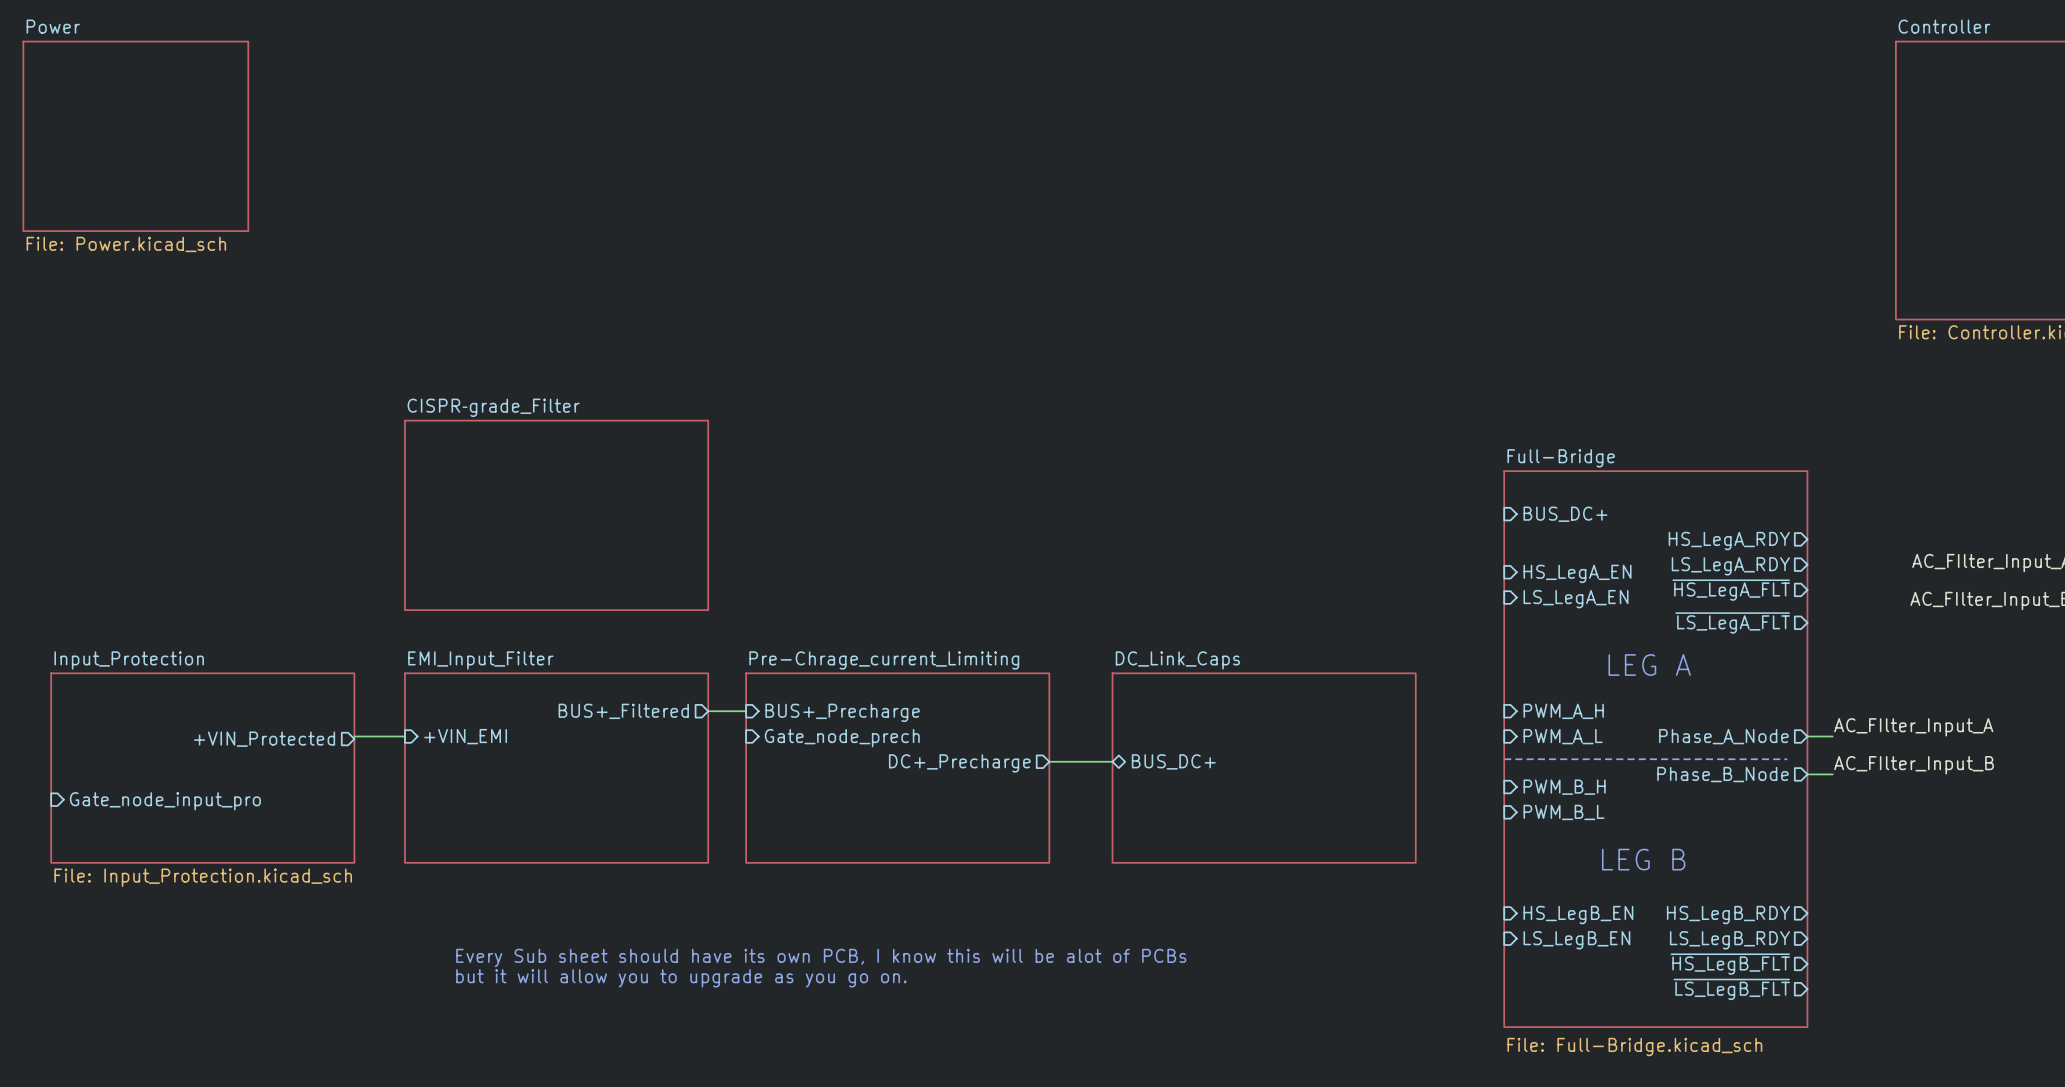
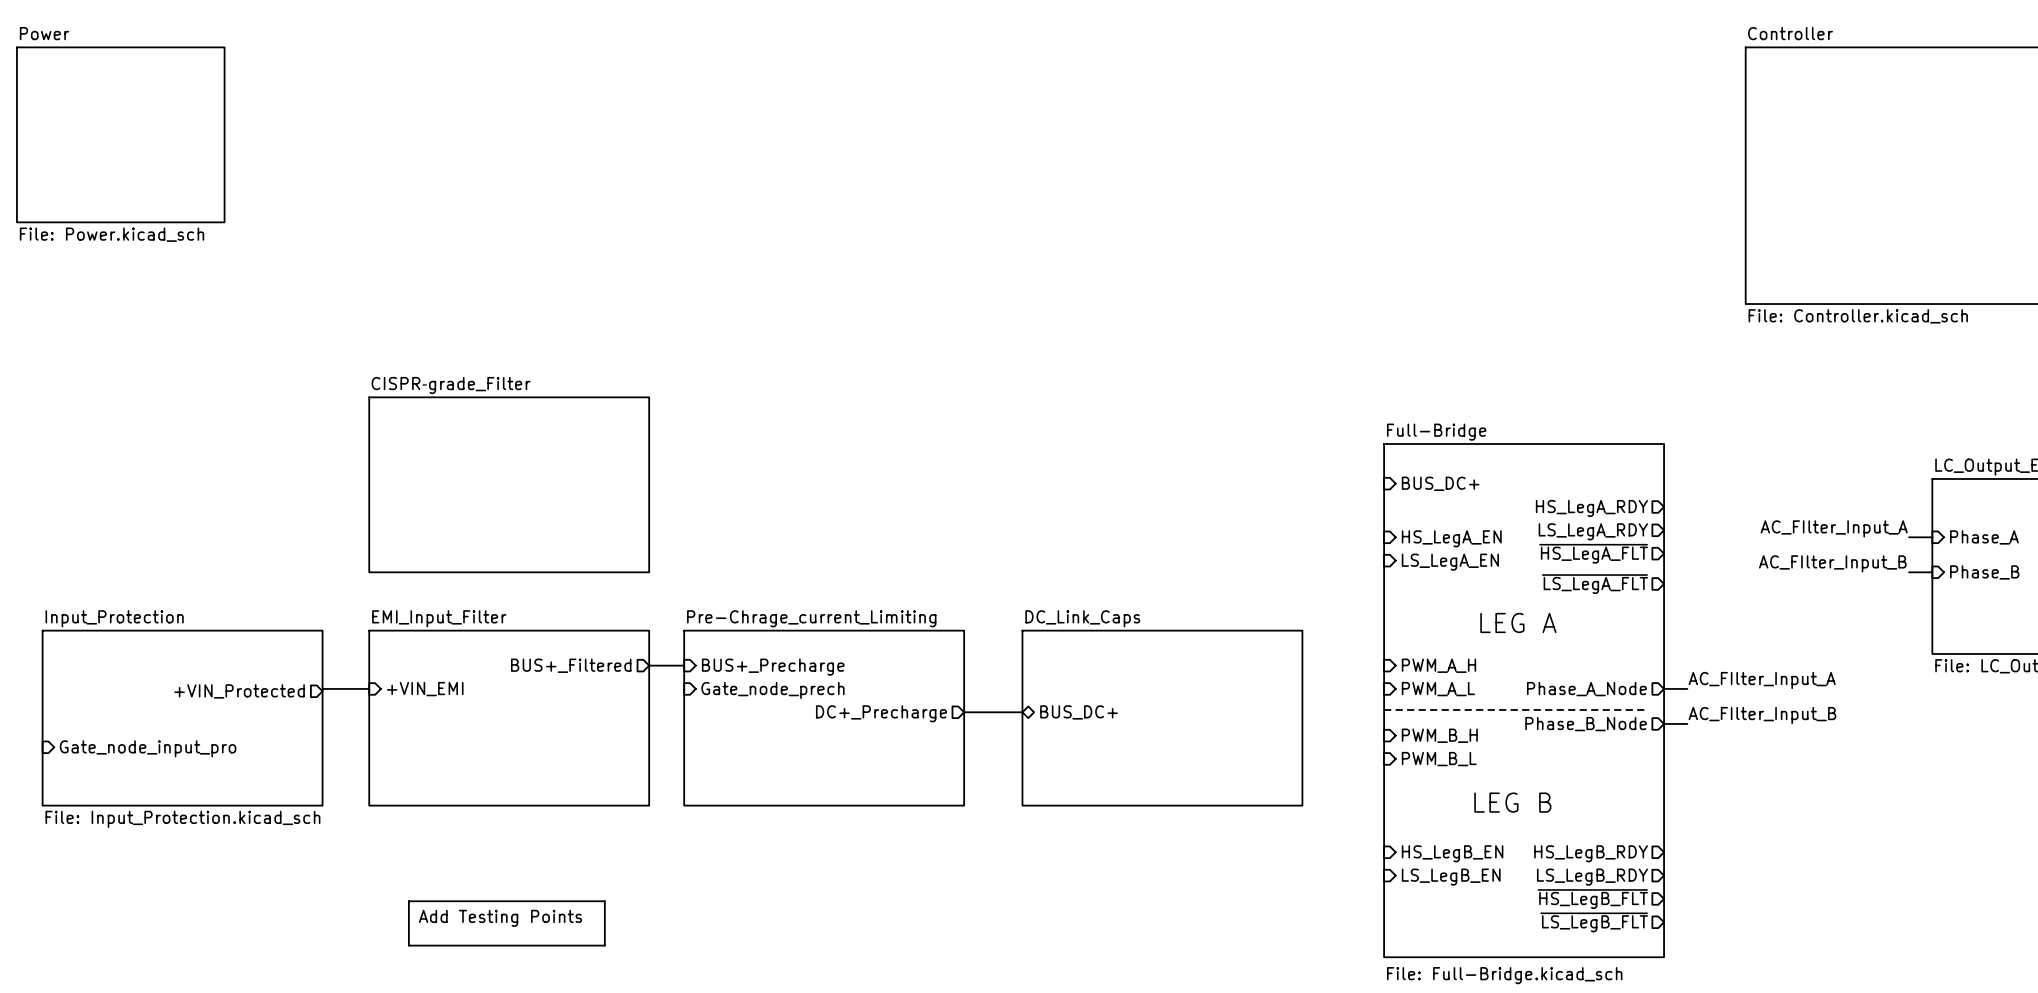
text: Every Sub sheet should have its own PCB, I know this will be alot of PCBs (821, 957) -> none
line: none -> (408, 901) (604, 901) (604, 945) (408, 945) (408, 901)
text: but it will allow you to upgrade as you go on. (681, 978) -> Add Testing Points (500, 918)

